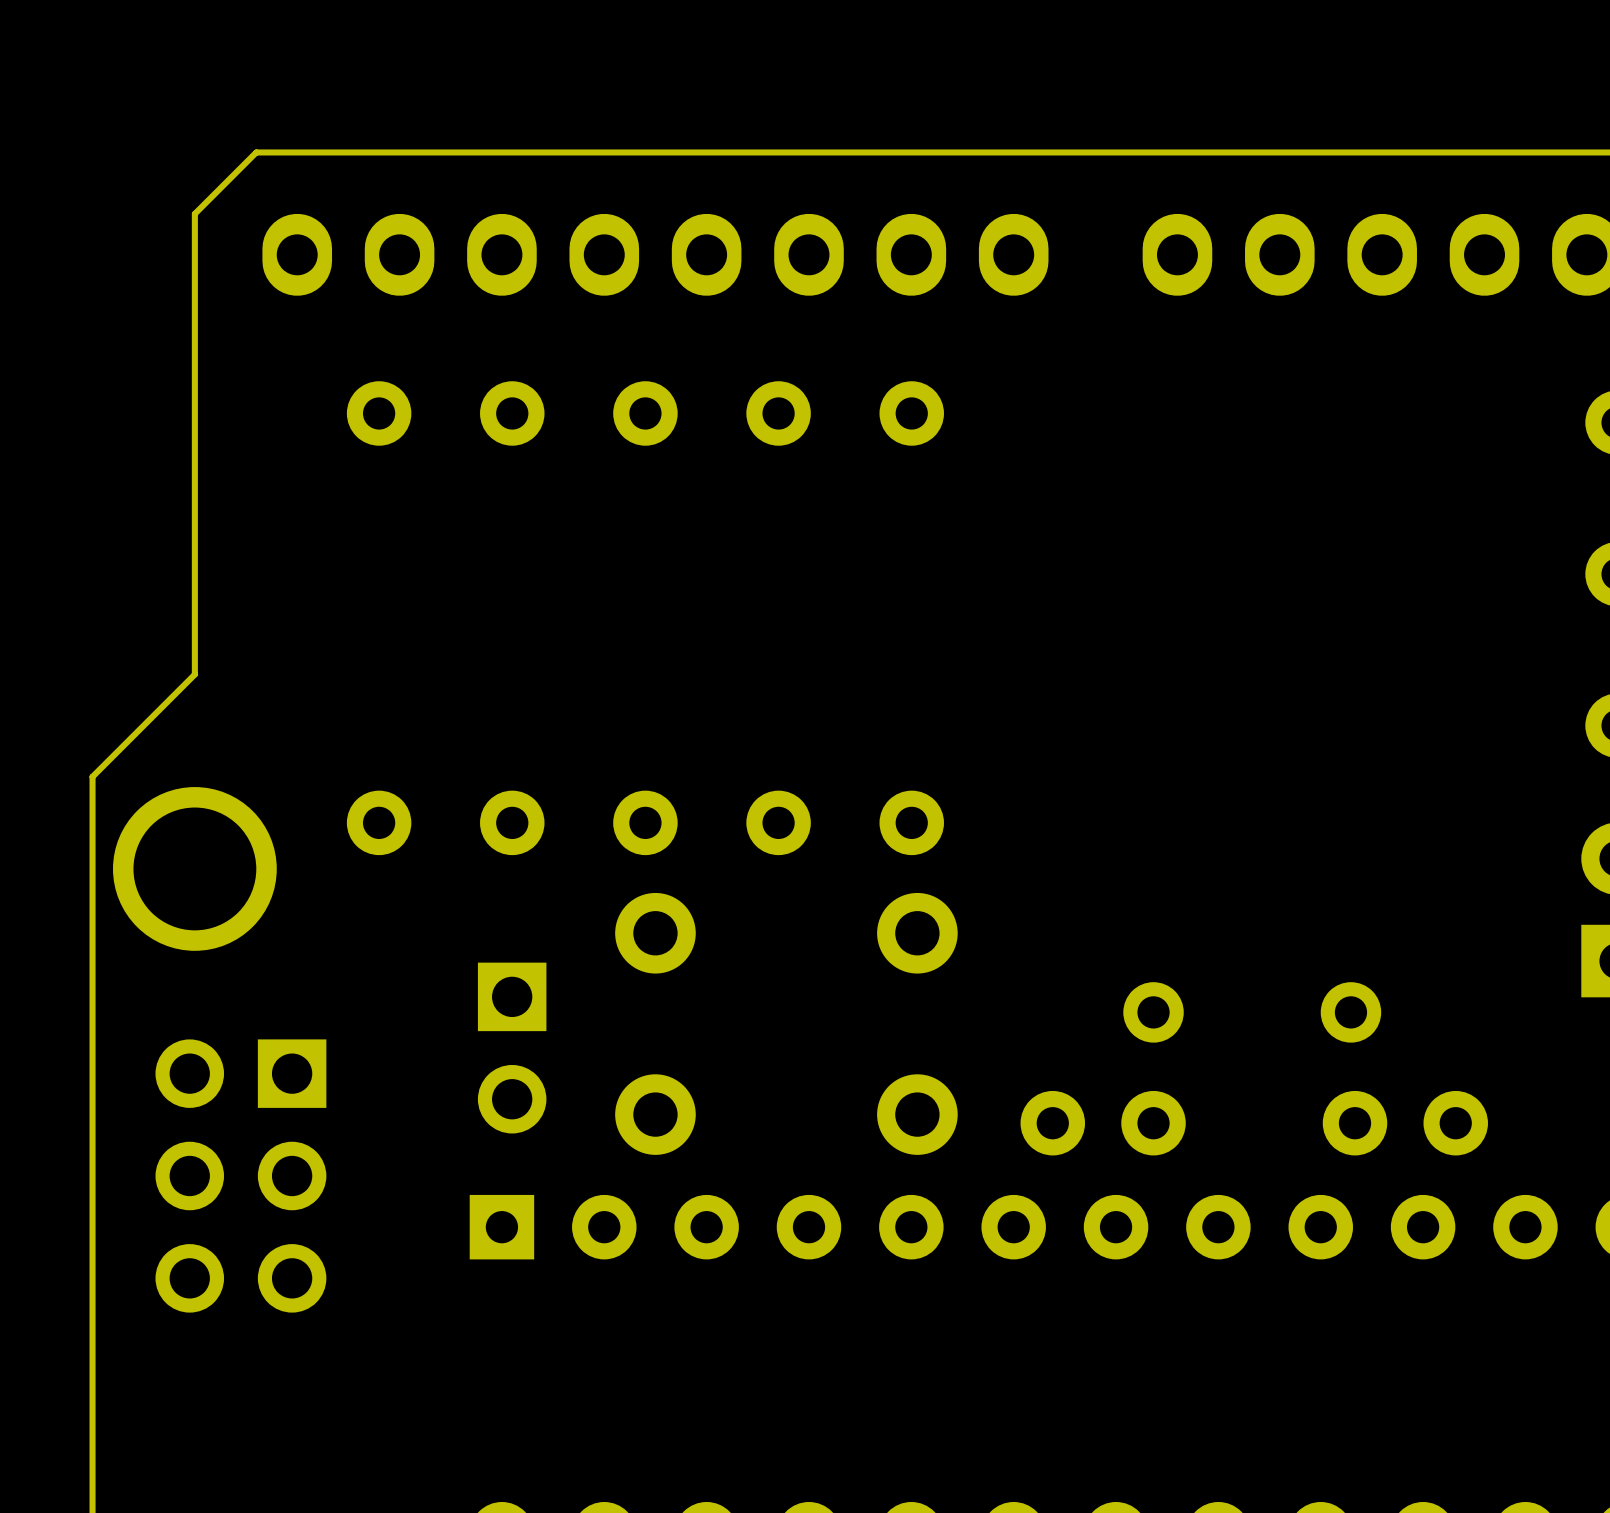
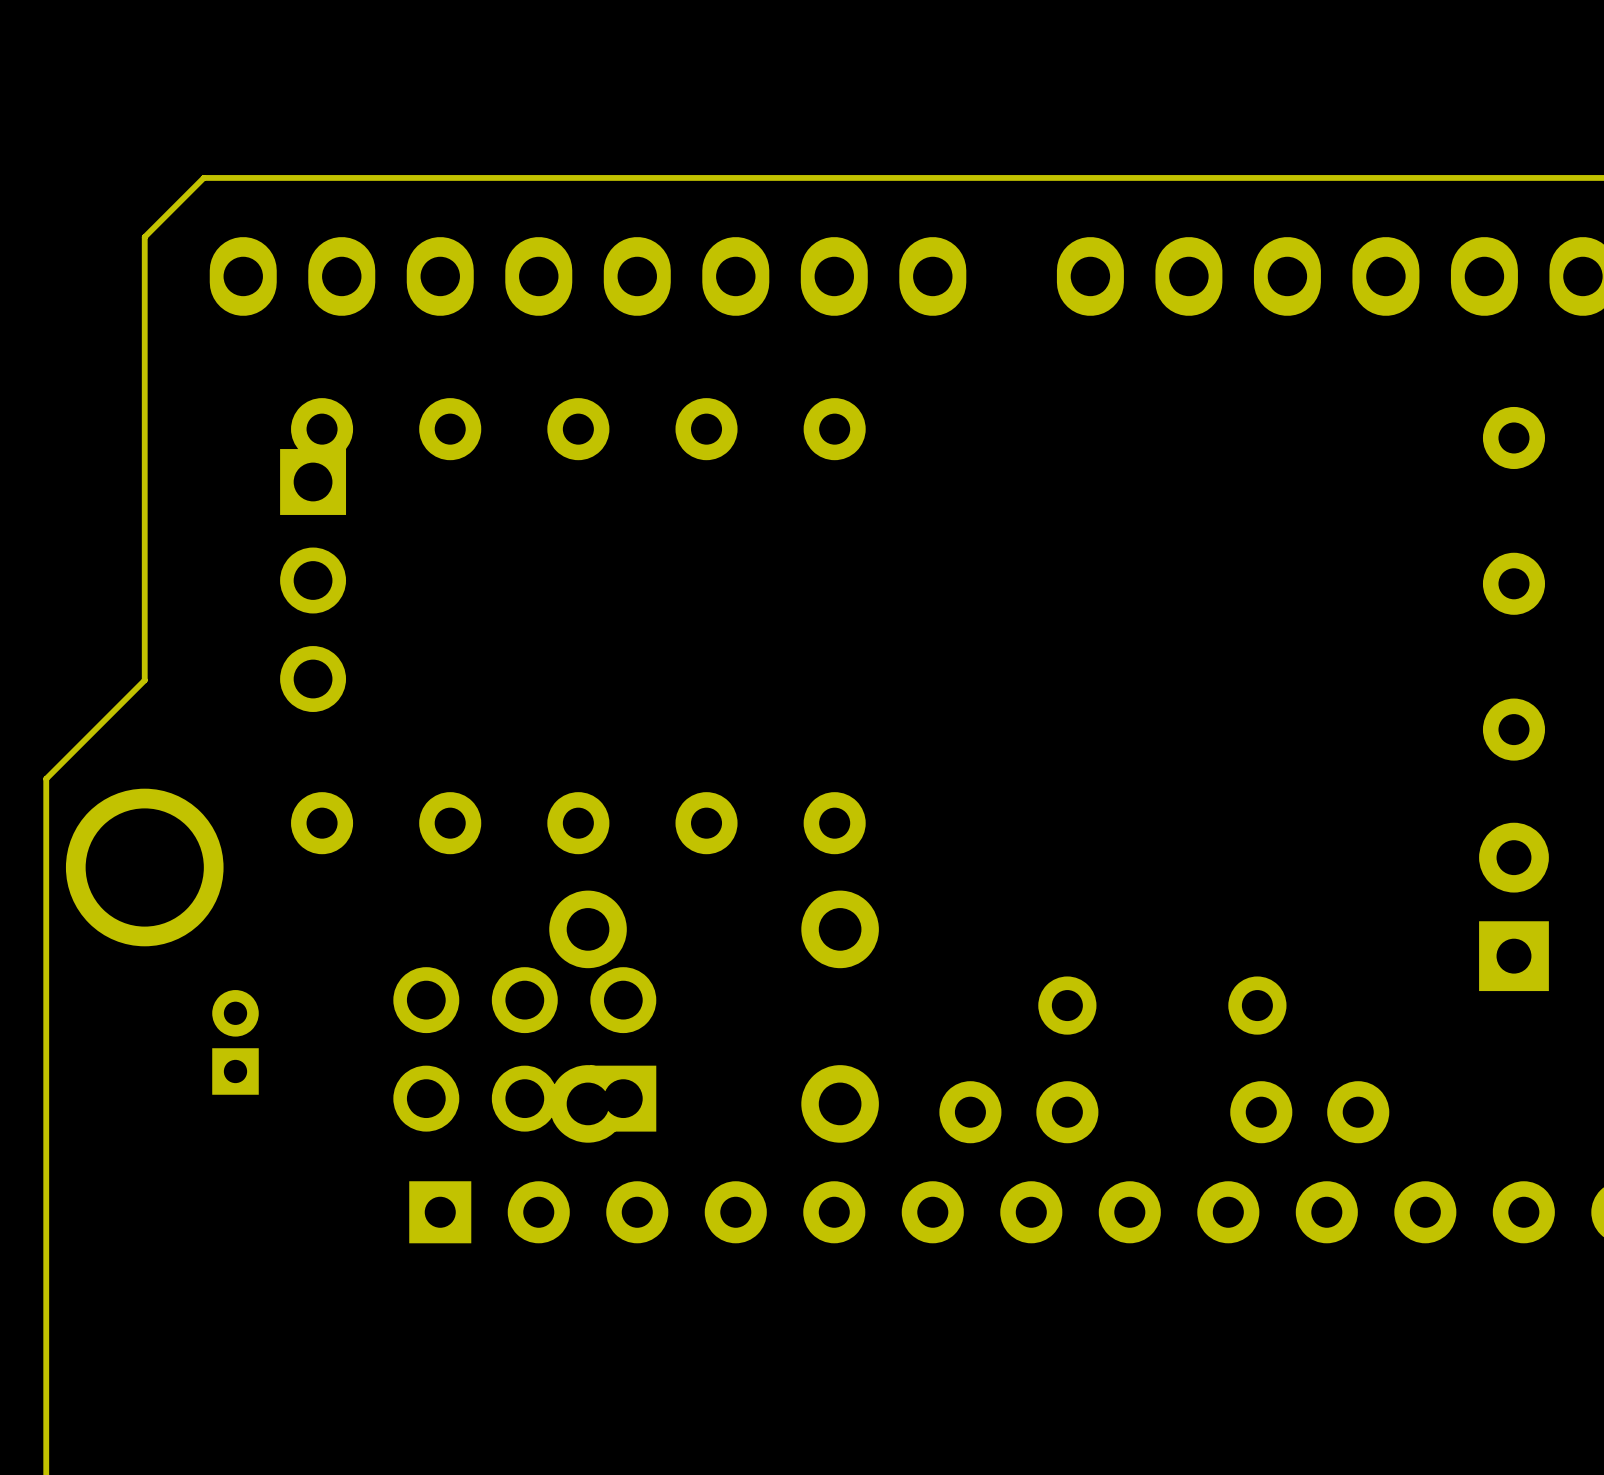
part: none -> (313, 580)
part: (512, 1048) -> none
part: none -> (235, 1042)
part rotation: 0° (240, 1176) -> 90° clockwise (524, 1049)
part position: (240, 1176) -> (524, 1049)

